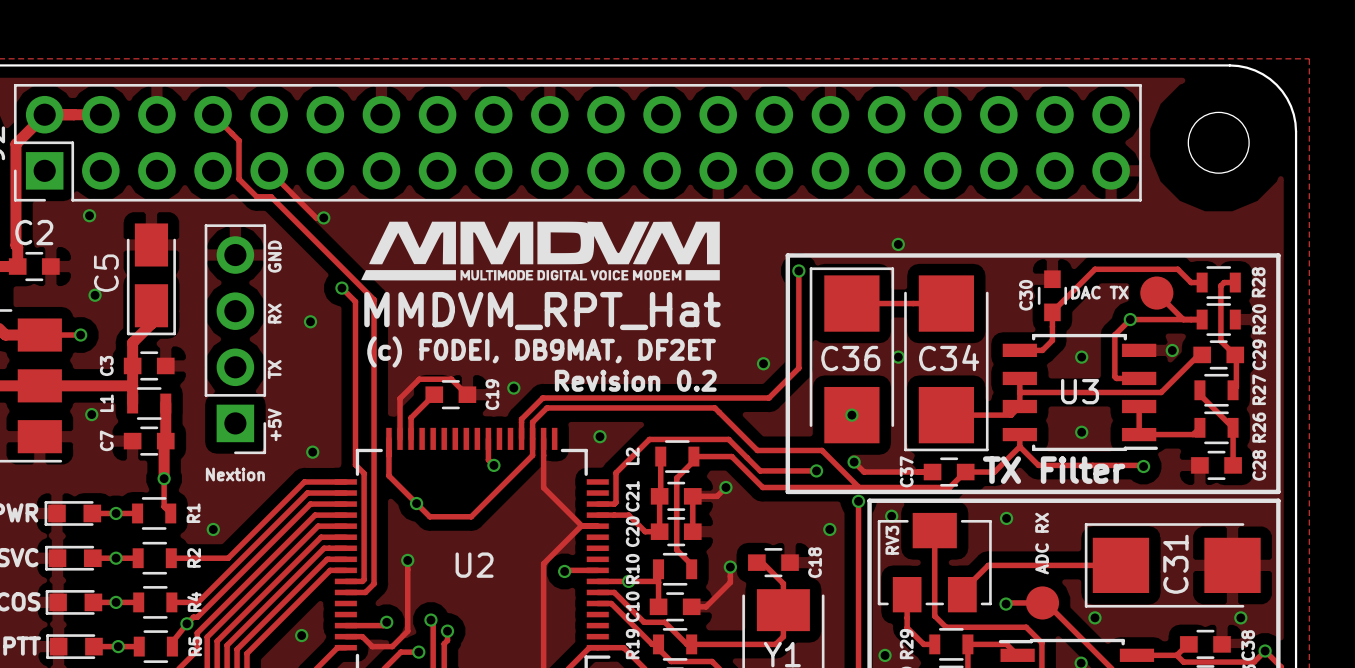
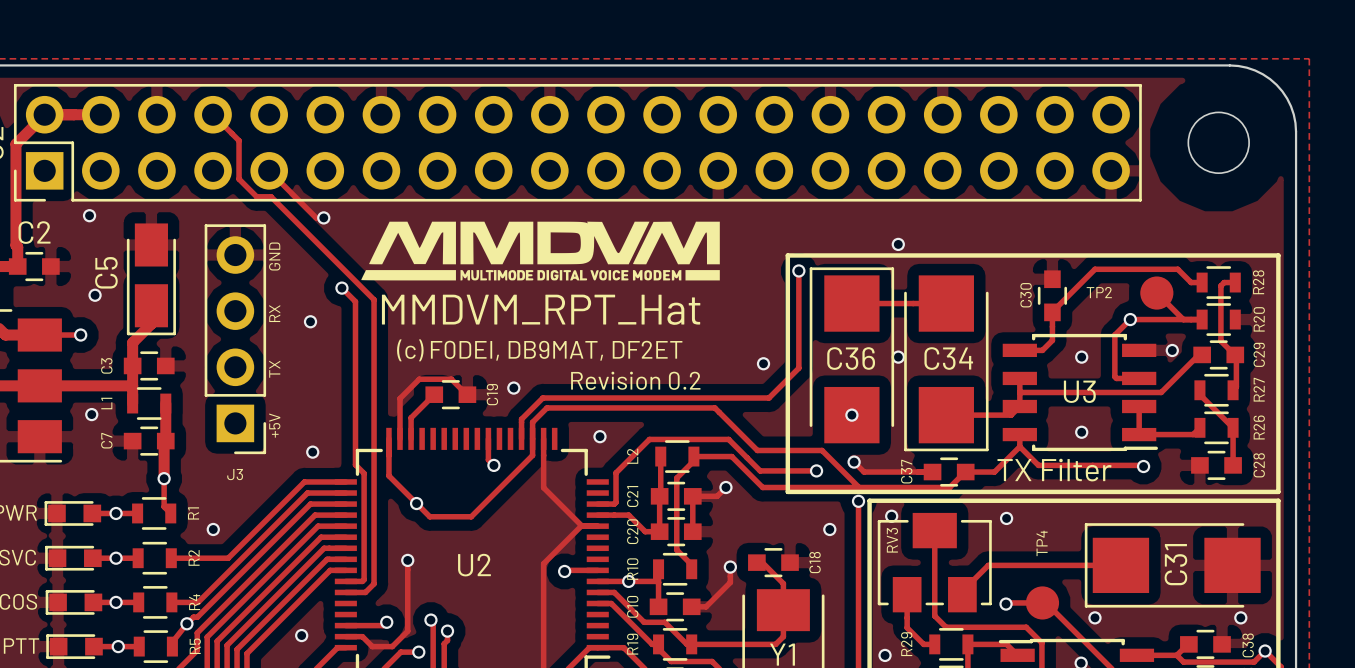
DAC TX name: DAC TX (1099, 292) -> TP2 (1099, 292)
Nextion name: Nextion (235, 474) -> J3 (235, 474)
ADC RX name: ADC RX (1042, 543) -> TP4 (1042, 543)

